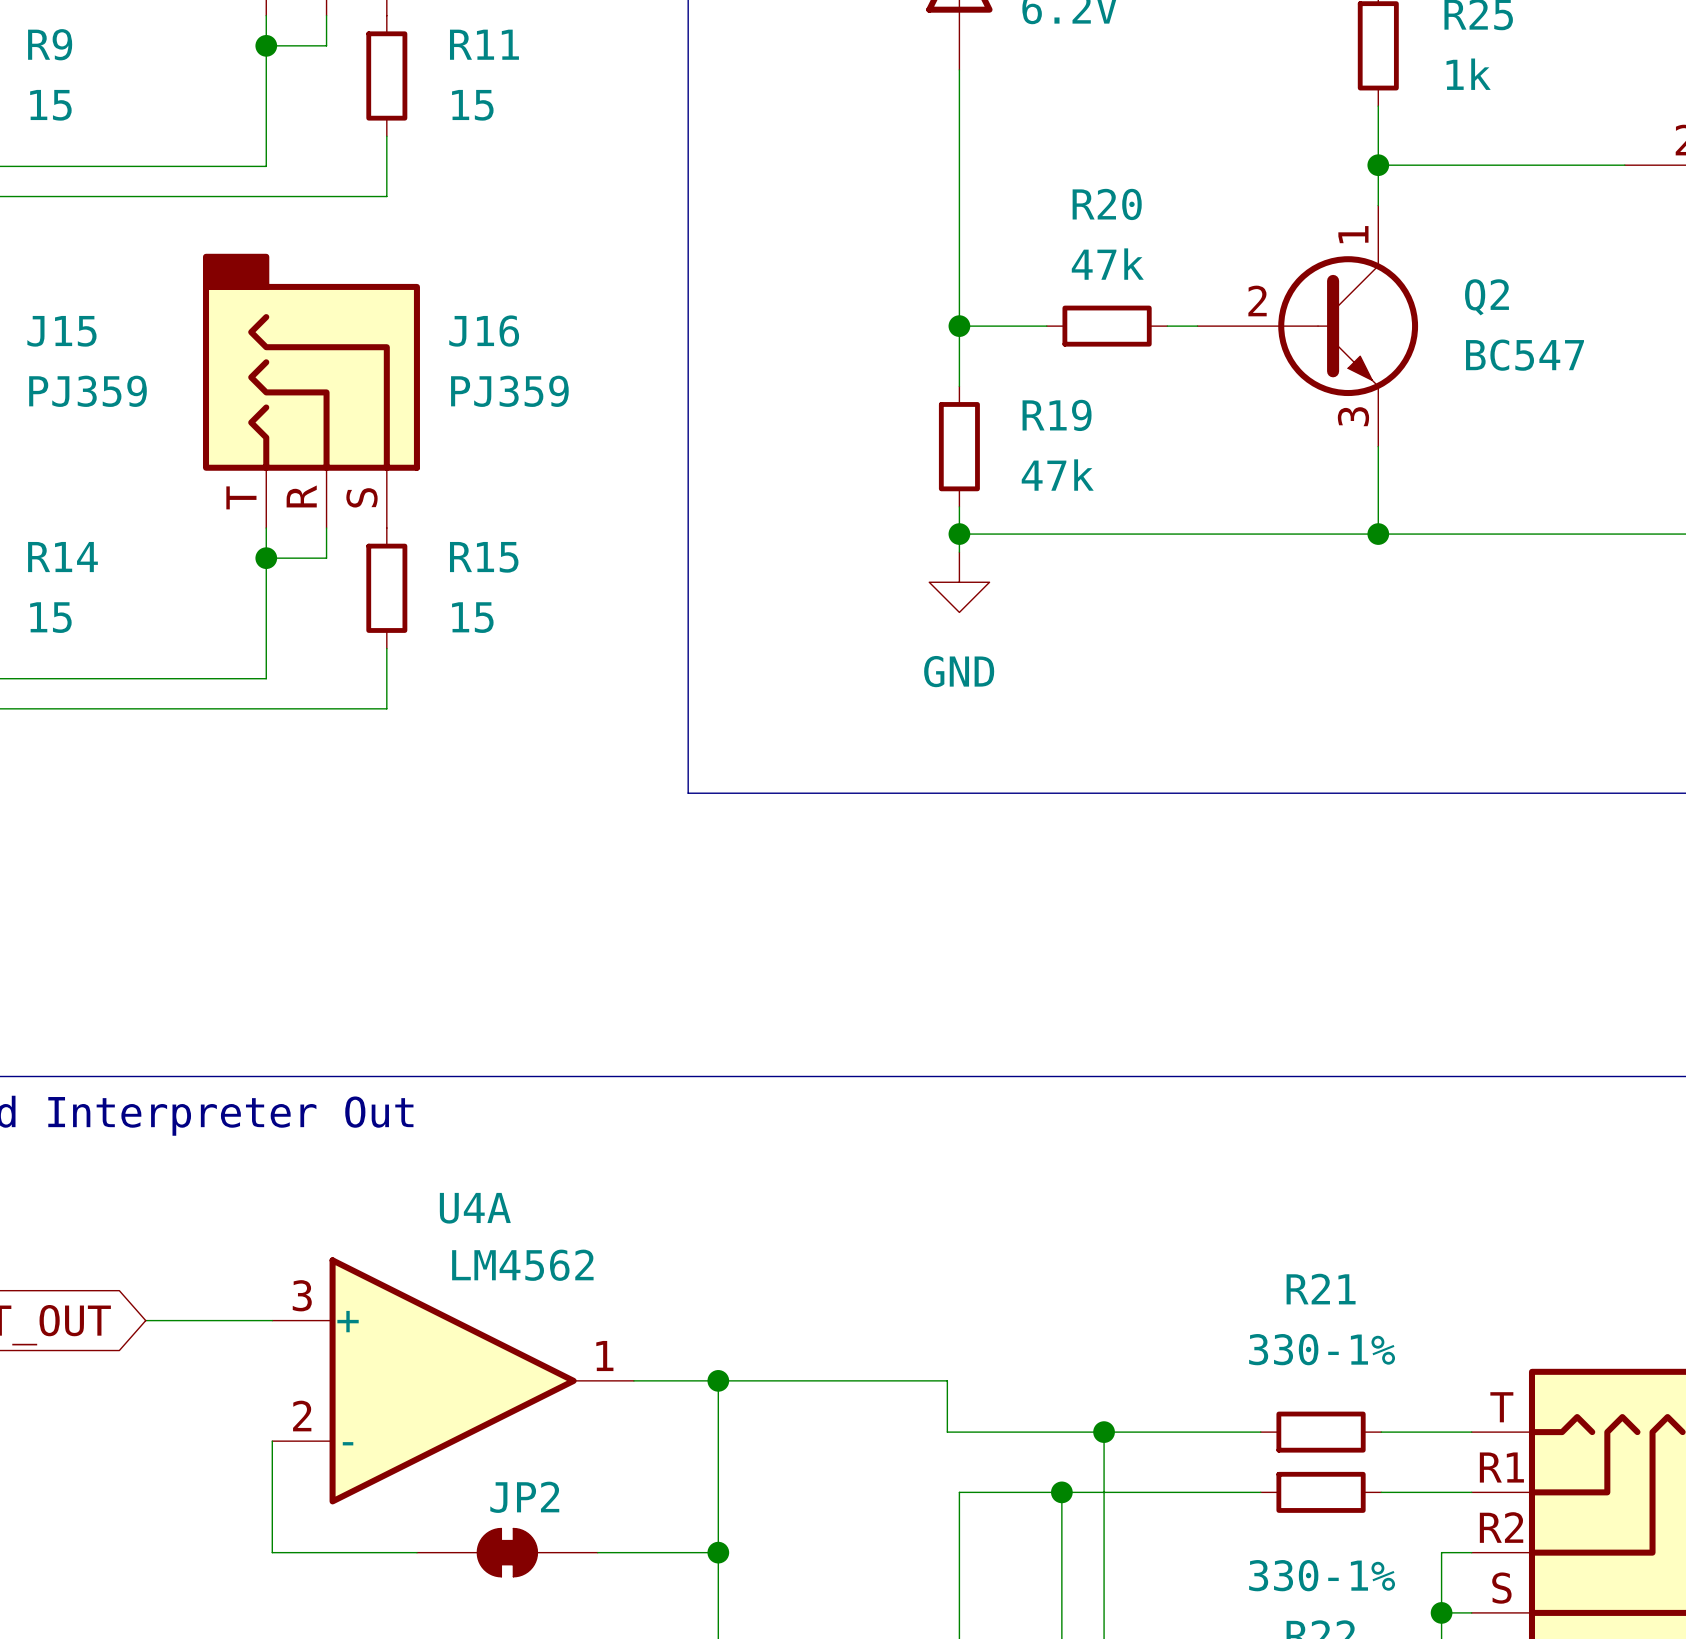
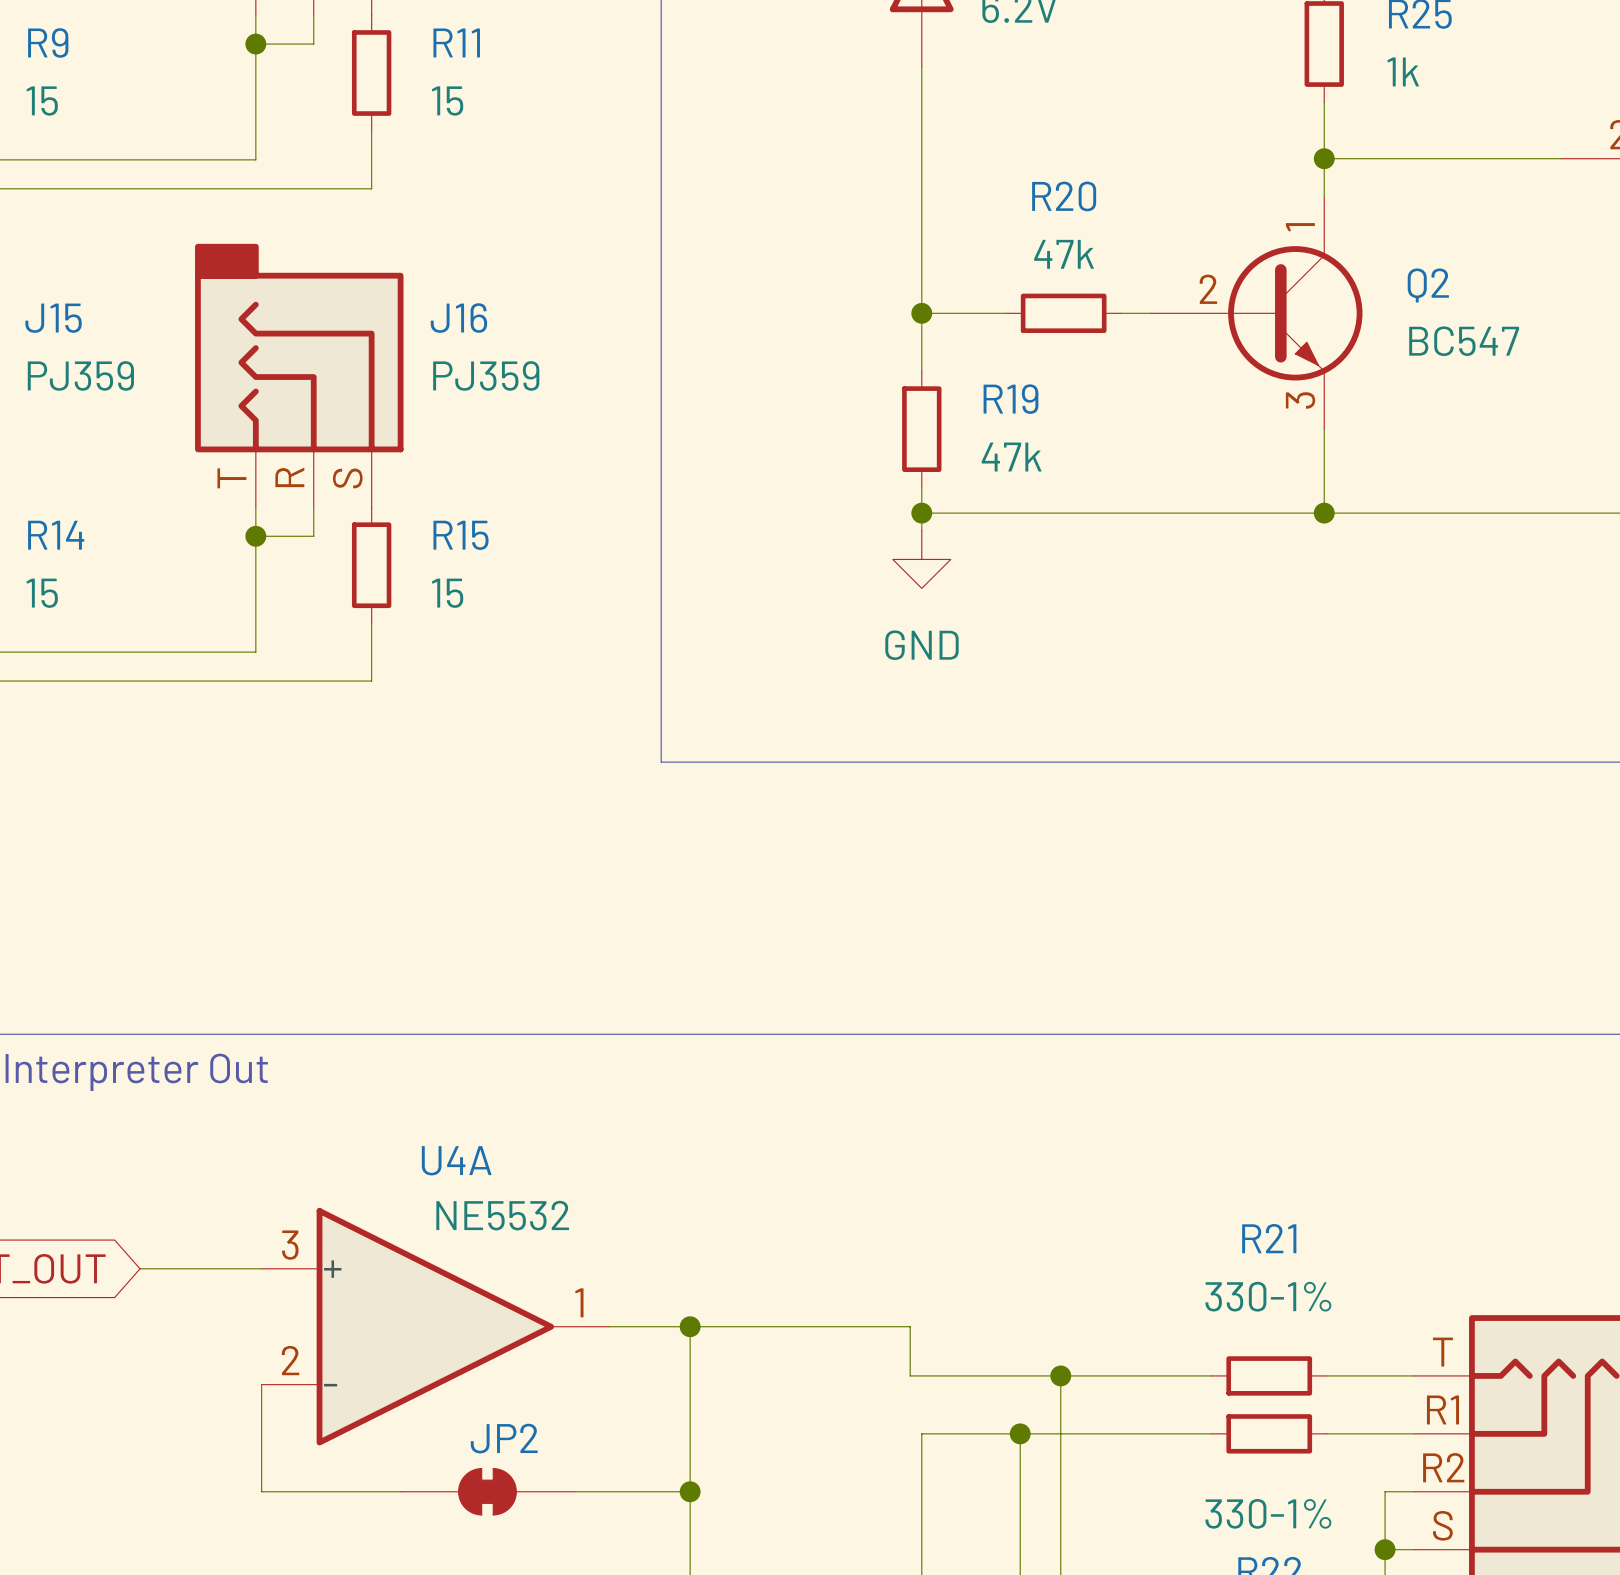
U4A value: LM4562 (522, 1265) -> NE5532 (502, 1215)

